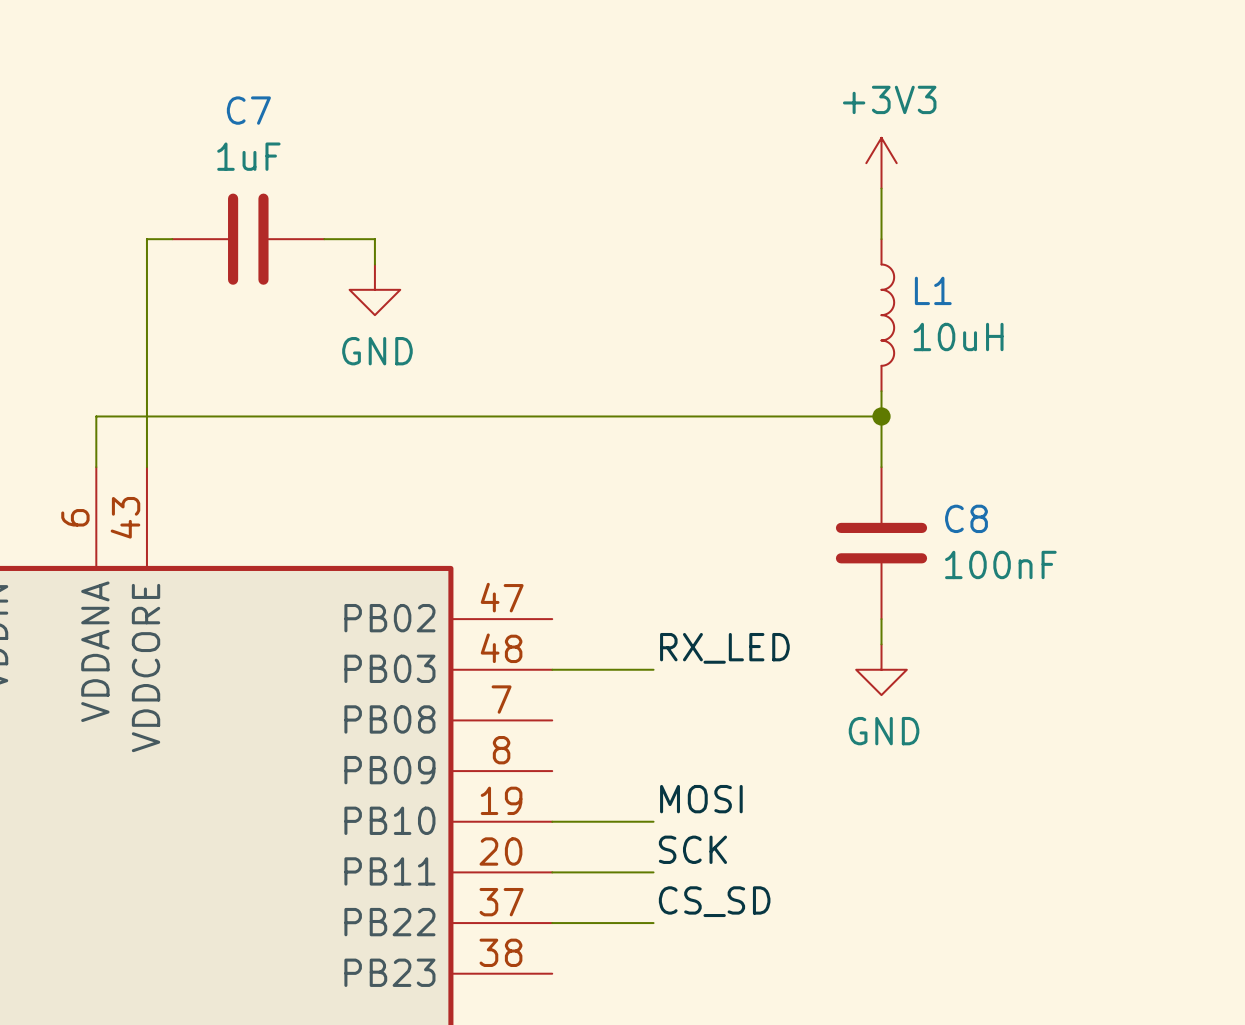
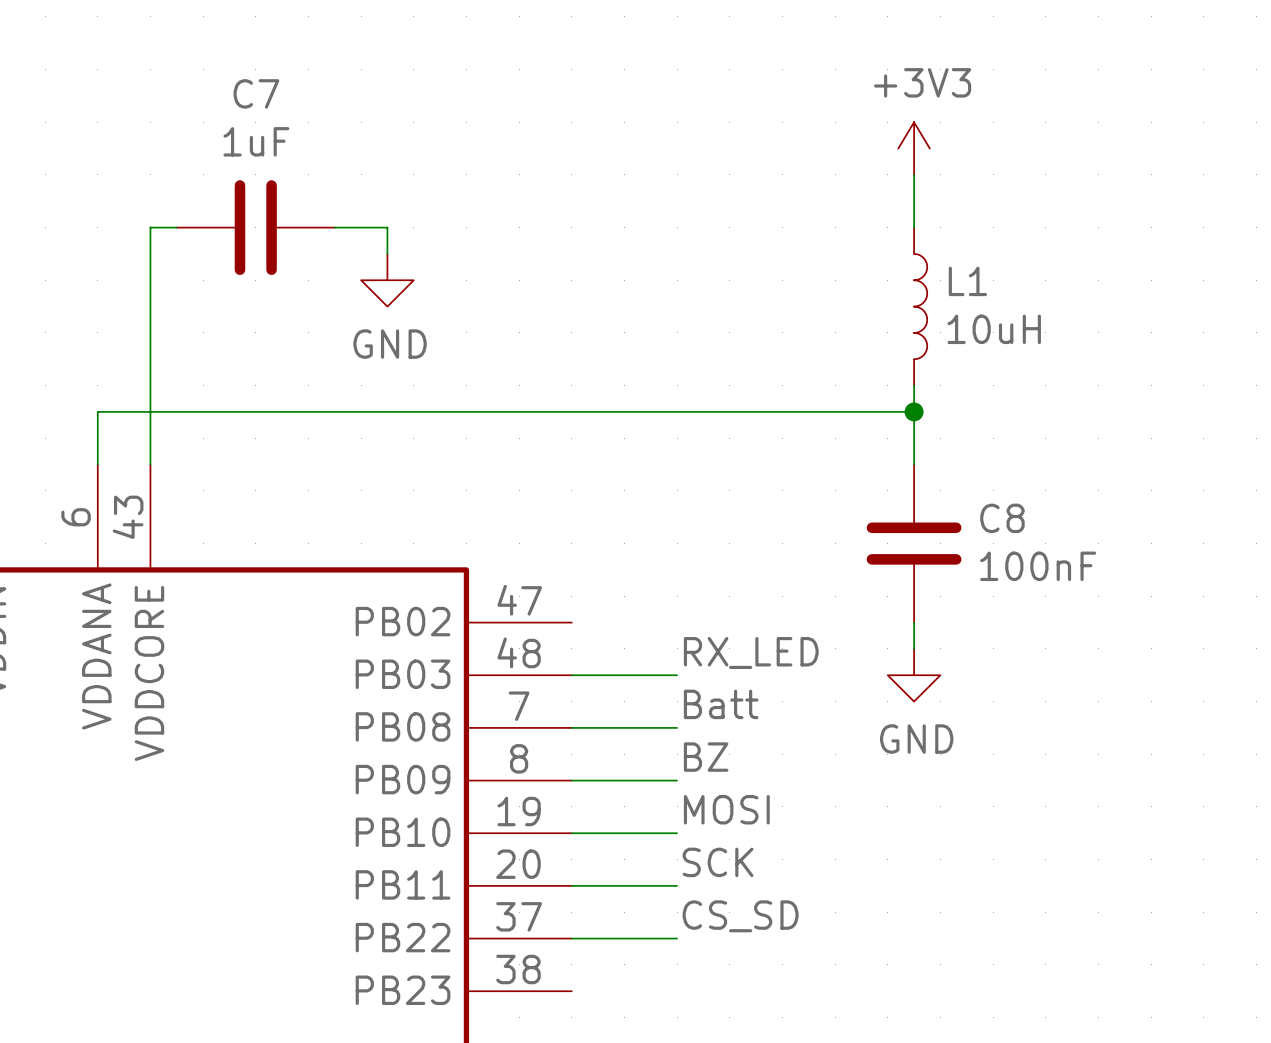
label: none -> Batt (721, 704)
wire: none -> (571, 727) (677, 727)
label: none -> BZ (706, 757)
wire: none -> (571, 780) (677, 780)

